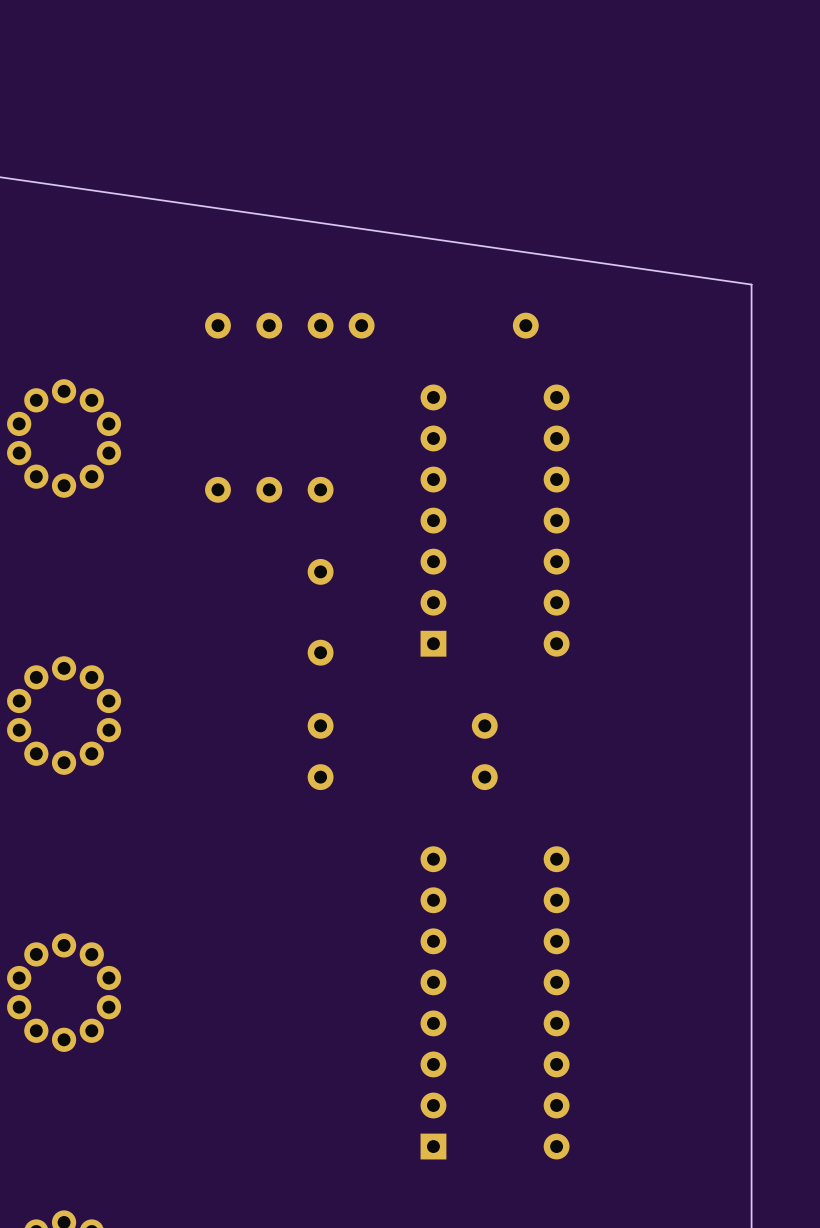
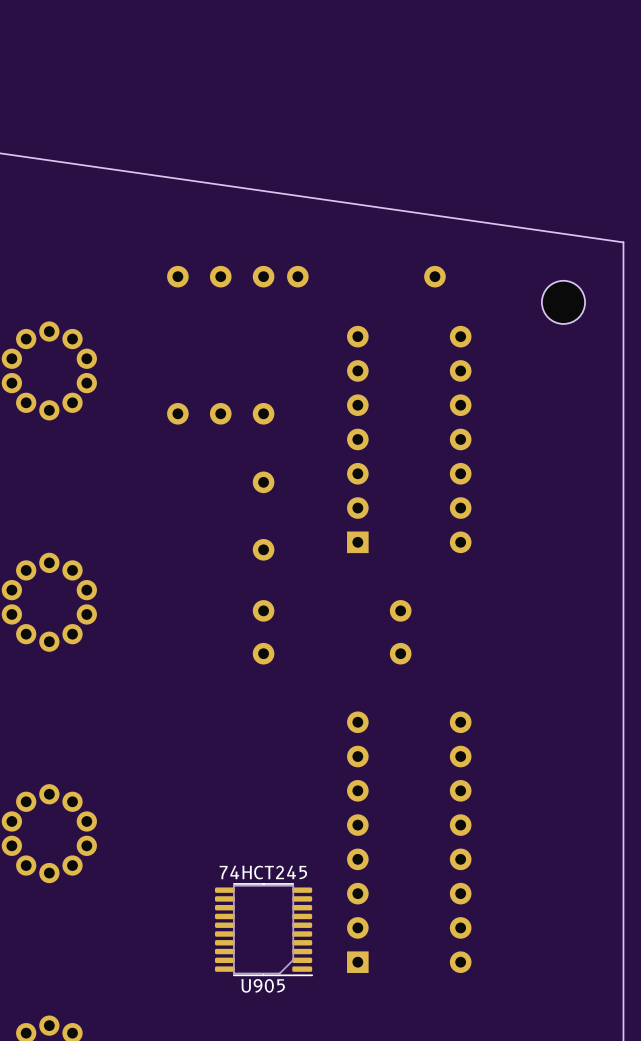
part: none -> (563, 302)
U905: none -> 74HCT245 (263, 929)

